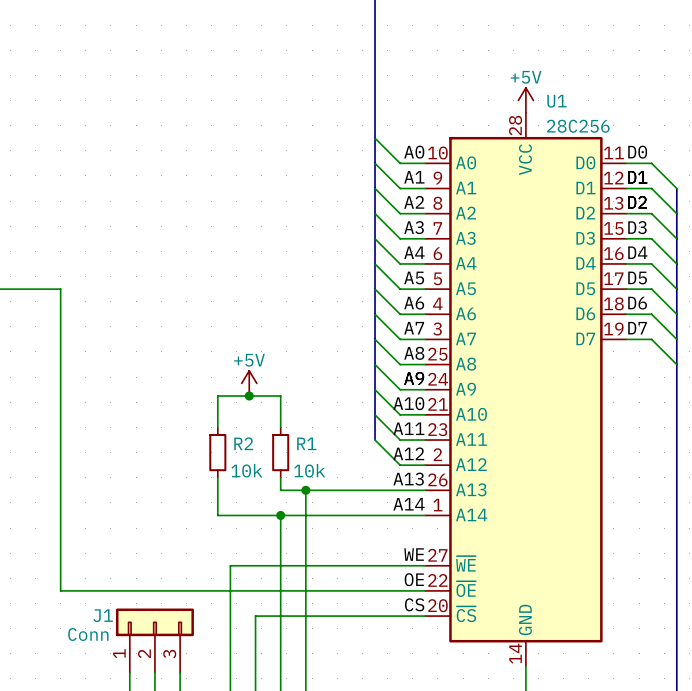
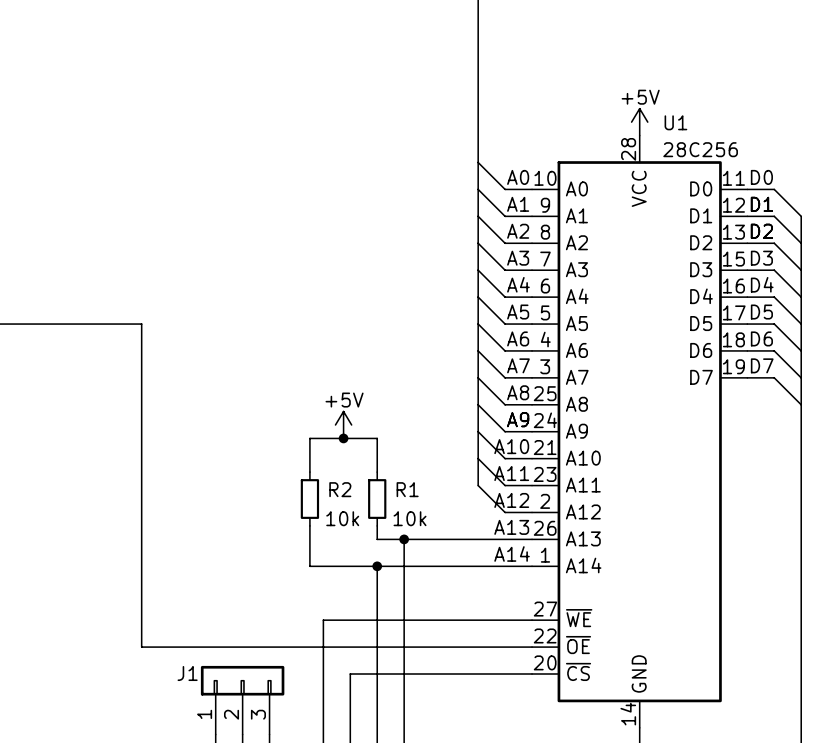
label: WE (414, 554) -> none
label: OE (414, 579) -> none
label: CS (414, 604) -> none
J1 value: Conn (88, 634) -> none

